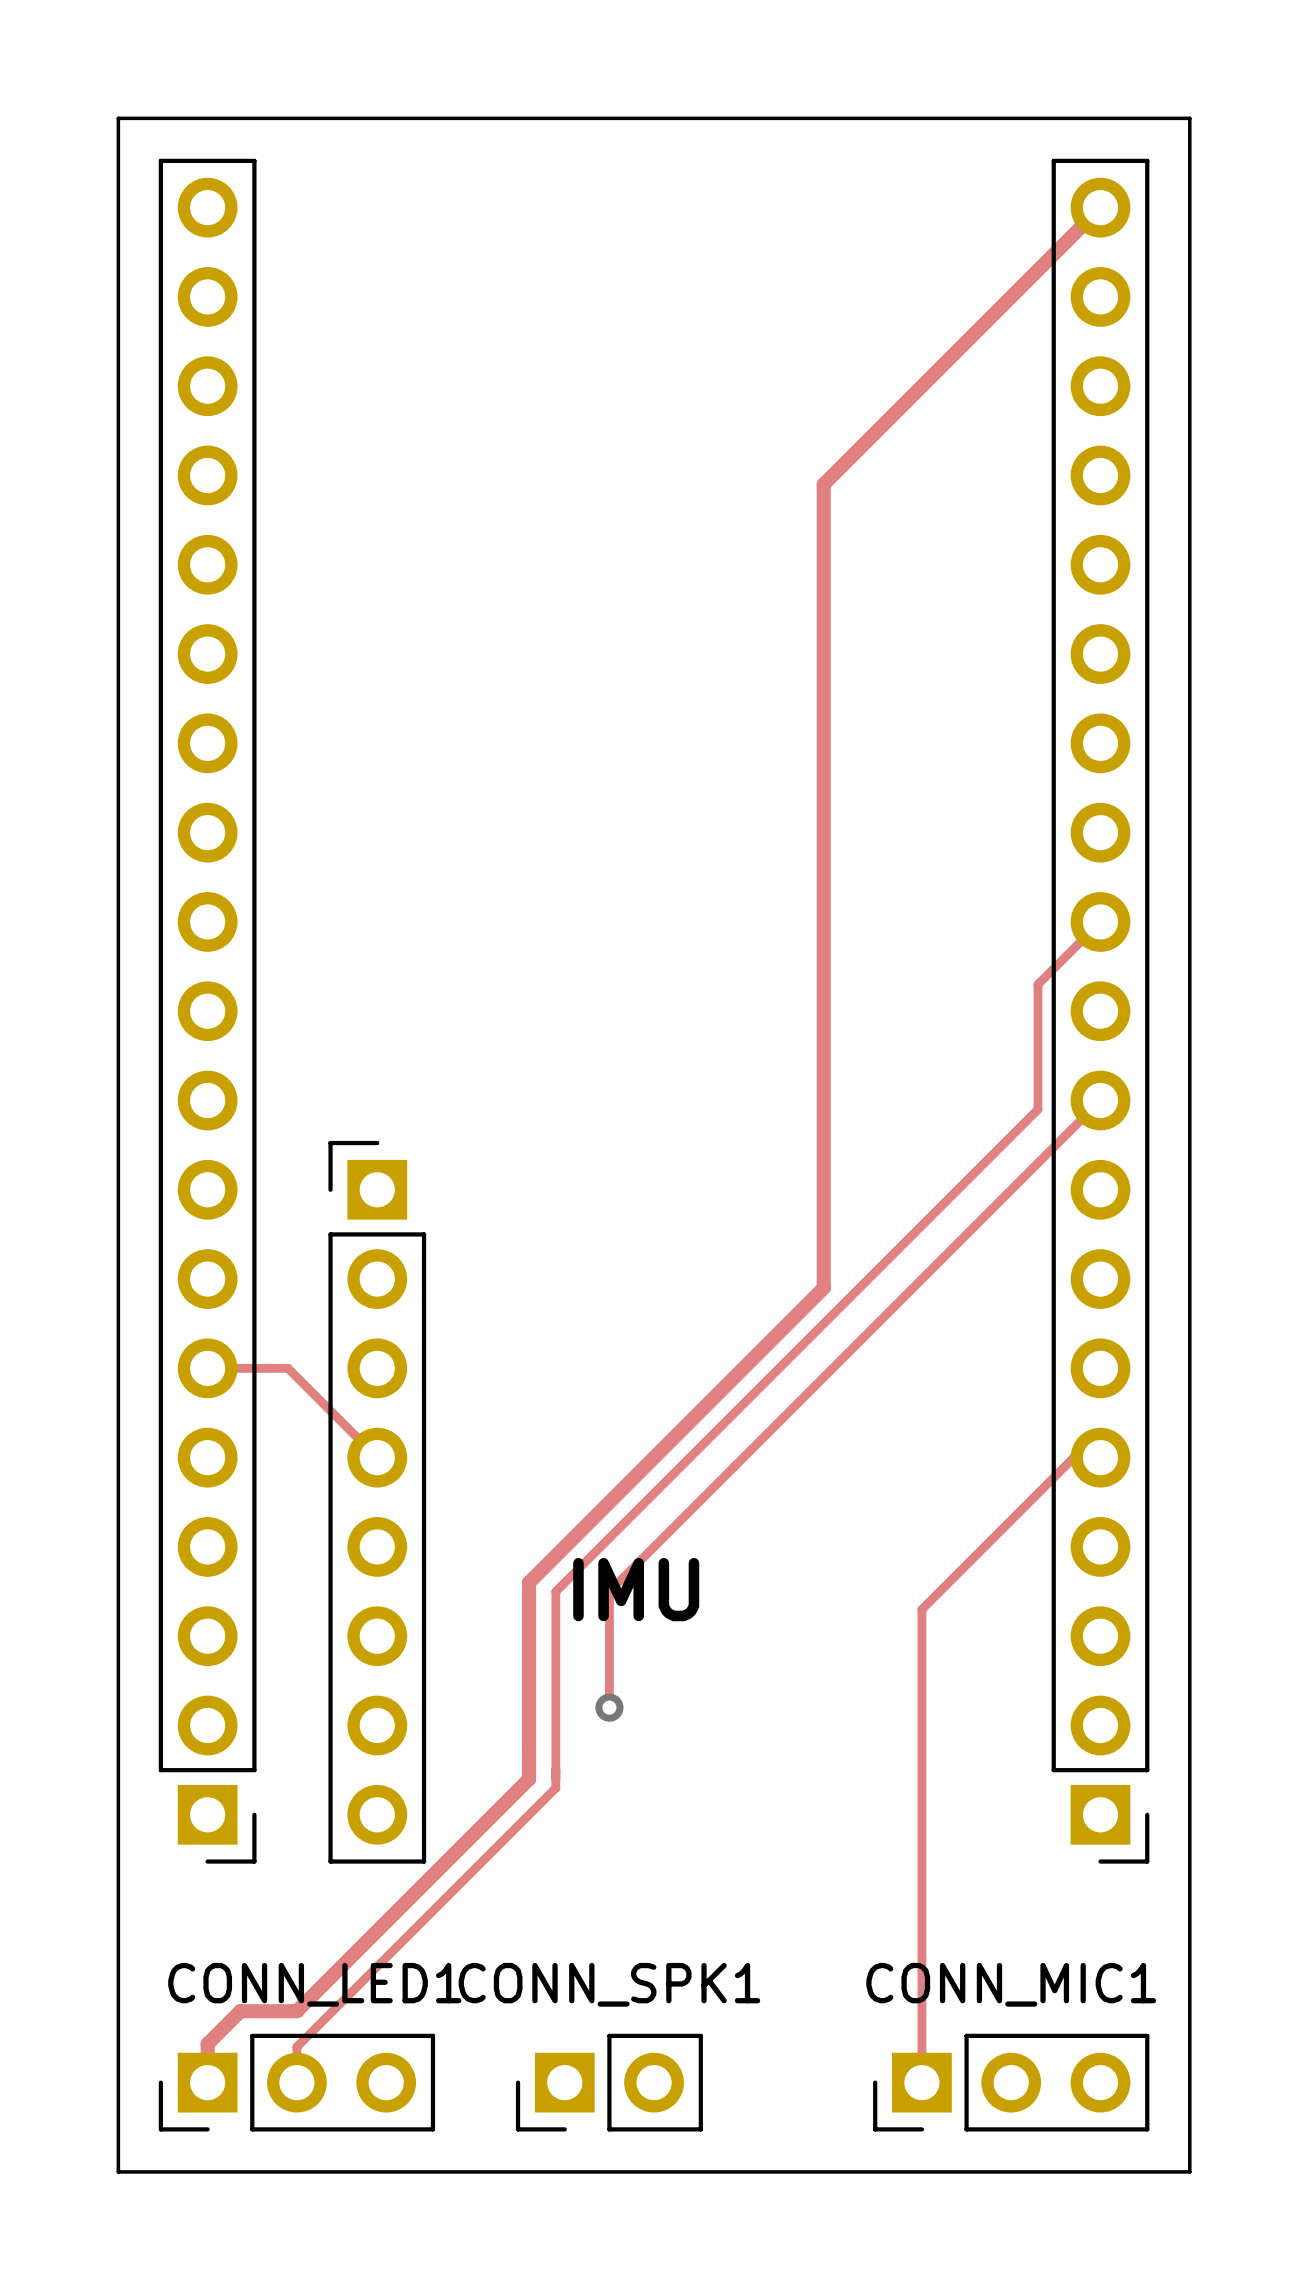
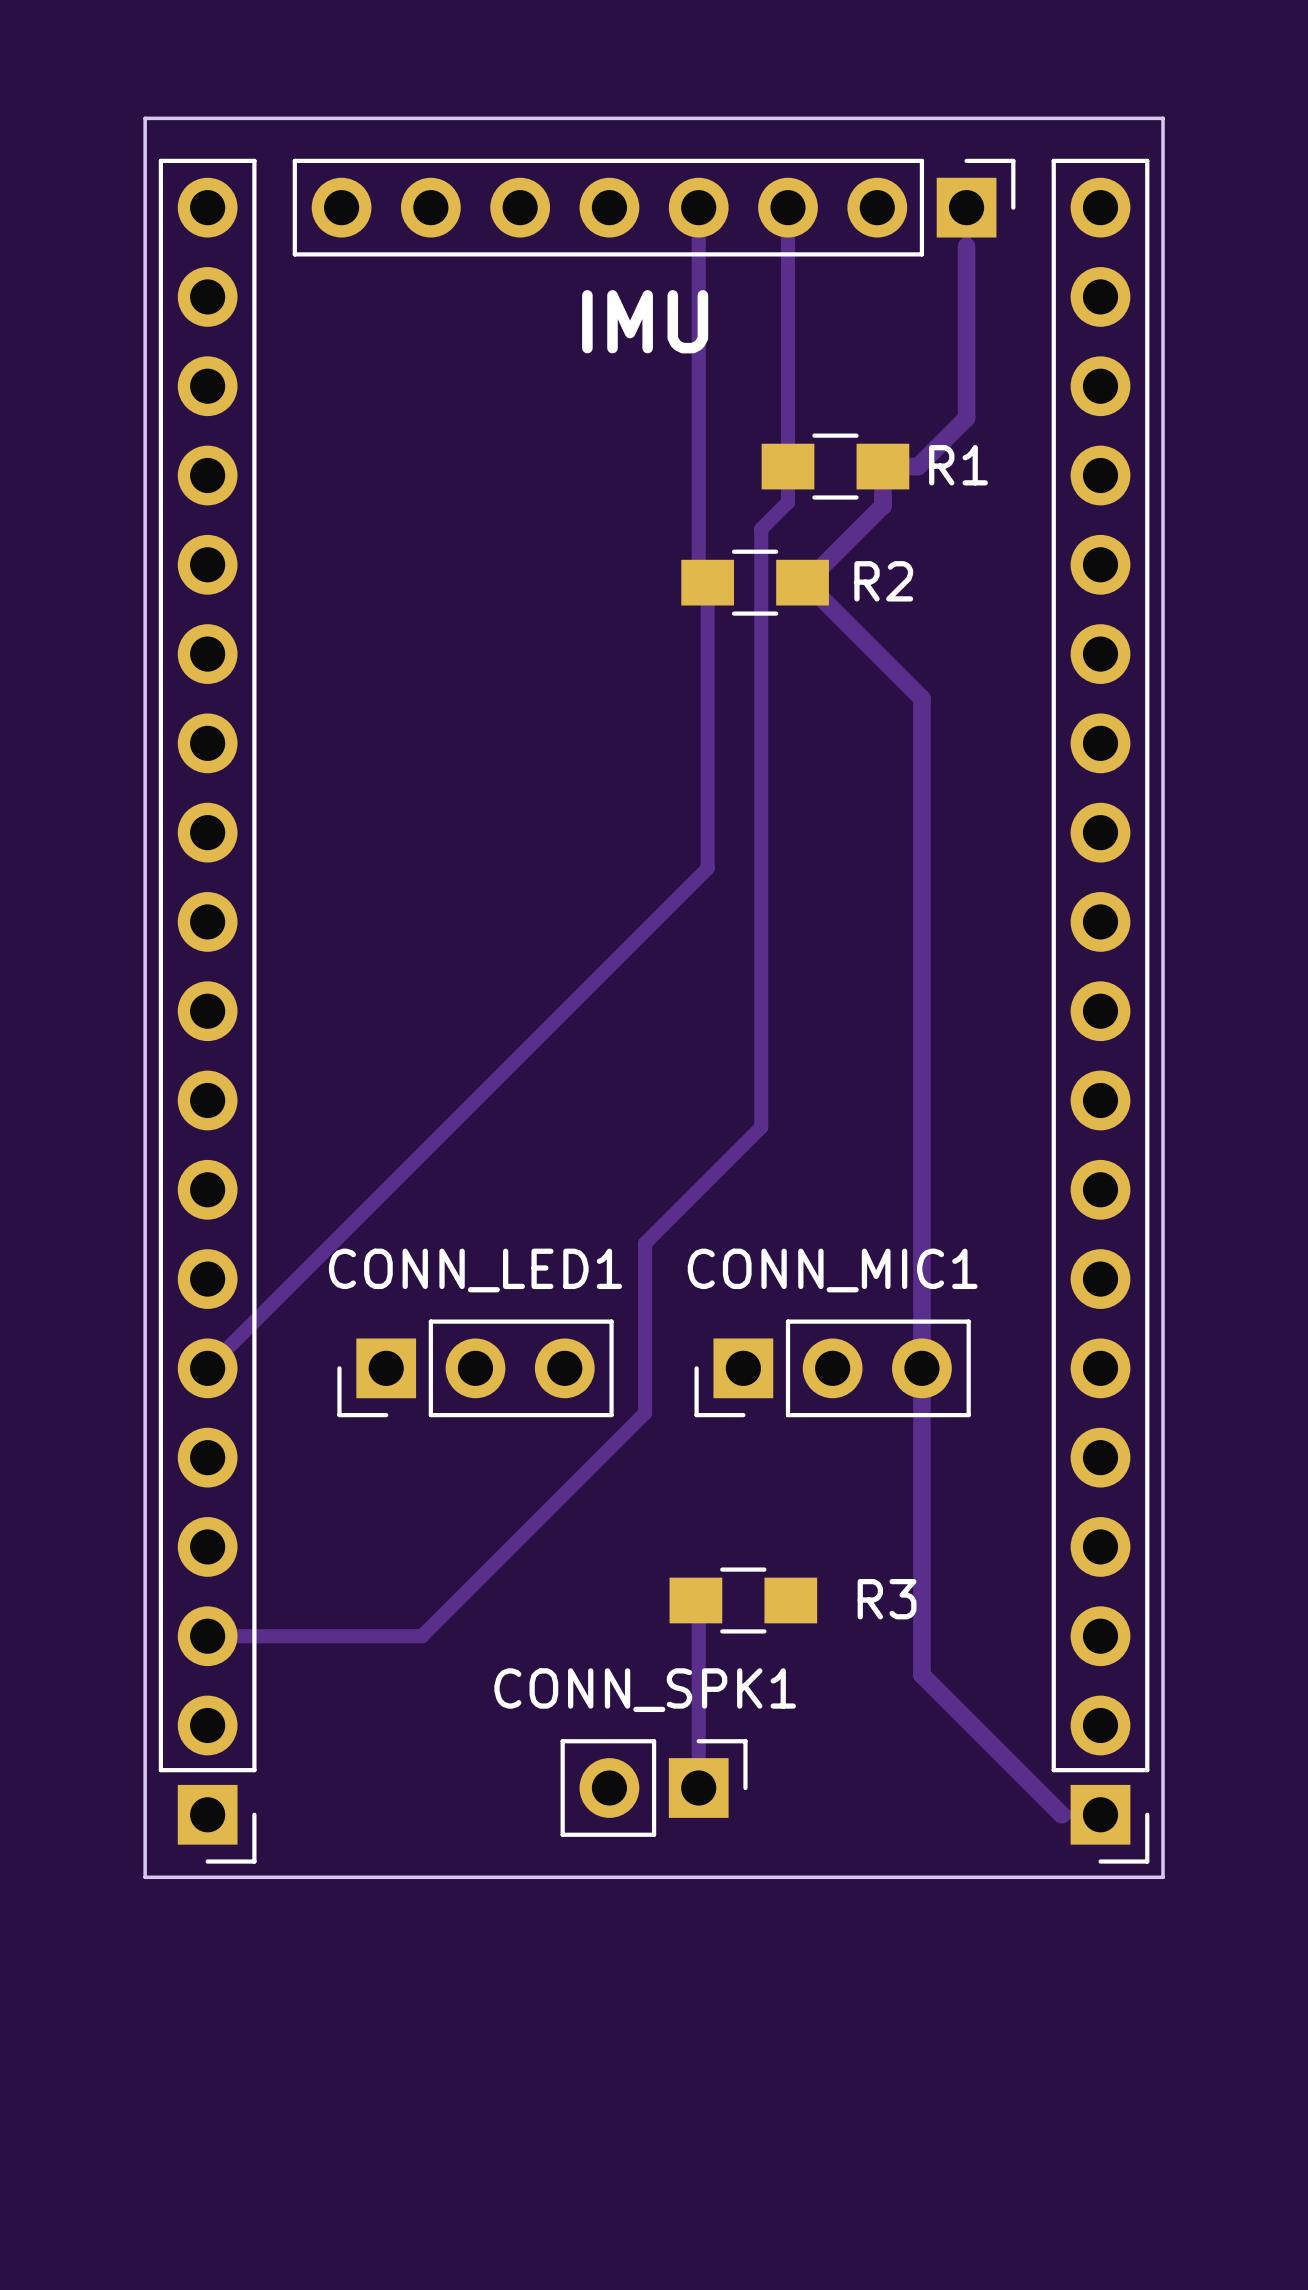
board edge: (145, 118) (118, 118) (118, 2171) (1189, 2171) (1189, 118) (1163, 118) -> (145, 118) (145, 1877) (1163, 1877) (1163, 118)
part: none -> (654, 207)
track: none -> (788, 207) (788, 502) (761, 529) (761, 1127) (645, 1243) (645, 1413) (421, 1636) (207, 1636)
track: none -> (966, 207) (966, 418) (918, 466) (882, 466) (882, 505) (806, 582)
track: (1100, 207) (823, 484) (823, 1288) (529, 1582) (529, 1779) (296, 2011) (240, 2011) (207, 2043) (207, 2082) -> none
text: none -> IMU (645, 321)
R1: none -> (835, 466)
R2: none -> (755, 582)
track: (1100, 921) (1038, 984) (1038, 1109) (555, 1591) (555, 1788) (296, 2046) (296, 2082) -> none
track: (1100, 1100) (609, 1591) (609, 1704) -> none
track: (207, 1368) (288, 1368) (377, 1457) -> (207, 1368) (707, 868) (707, 582) (698, 573) (698, 207)
track: (1100, 1457) (1073, 1457) (921, 1609) -> (806, 582) (921, 698) (921, 1609)
part: (377, 1502) -> none
text: IMU (636, 1589) -> none
track: none -> (695, 1600) (698, 1603) (698, 1788)
R3: none -> (743, 1600)
track width: thin (921, 1609) (921, 1674) -> thick (921, 1609) (921, 1674)
track: (921, 1674) (921, 2082) -> (921, 1674) (1061, 1814) (1100, 1814)
via: (609, 1707) -> none
CONN_LED1 name position: CONN_LED1 (314, 1984) -> CONN_LED1 (475, 1270)
CONN_LED1 position: (296, 2082) -> (475, 1368)
CONN_SPK1 rotation: 0° (609, 2082) -> 180° (654, 1788)
CONN_SPK1 position: (609, 2082) -> (654, 1788)
CONN_MIC1 position: (1011, 2082) -> (832, 1368)

